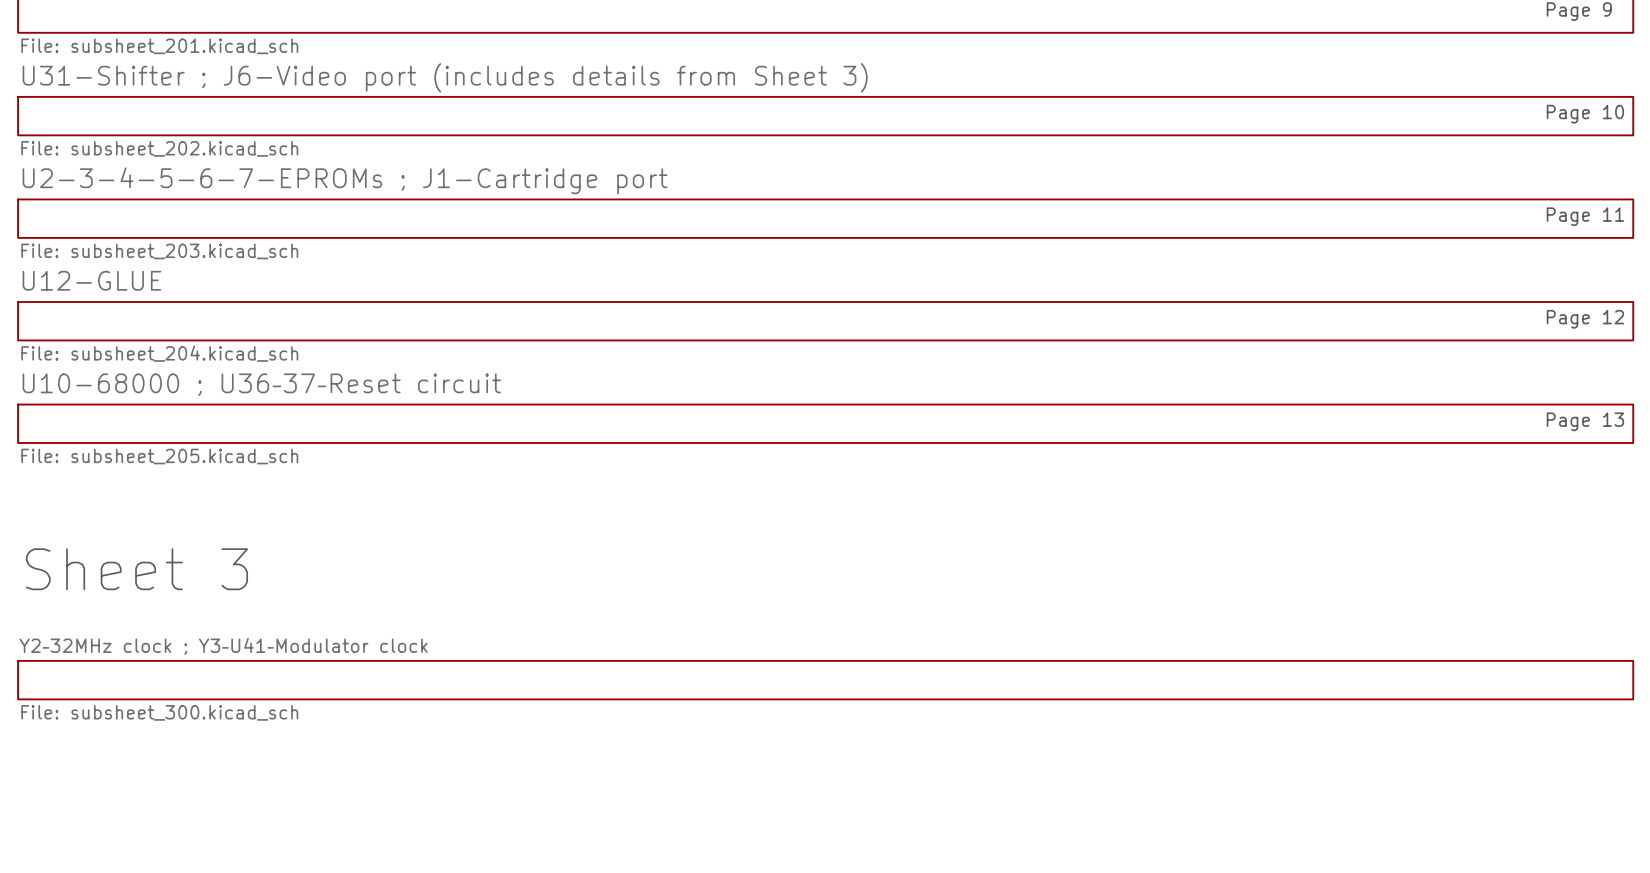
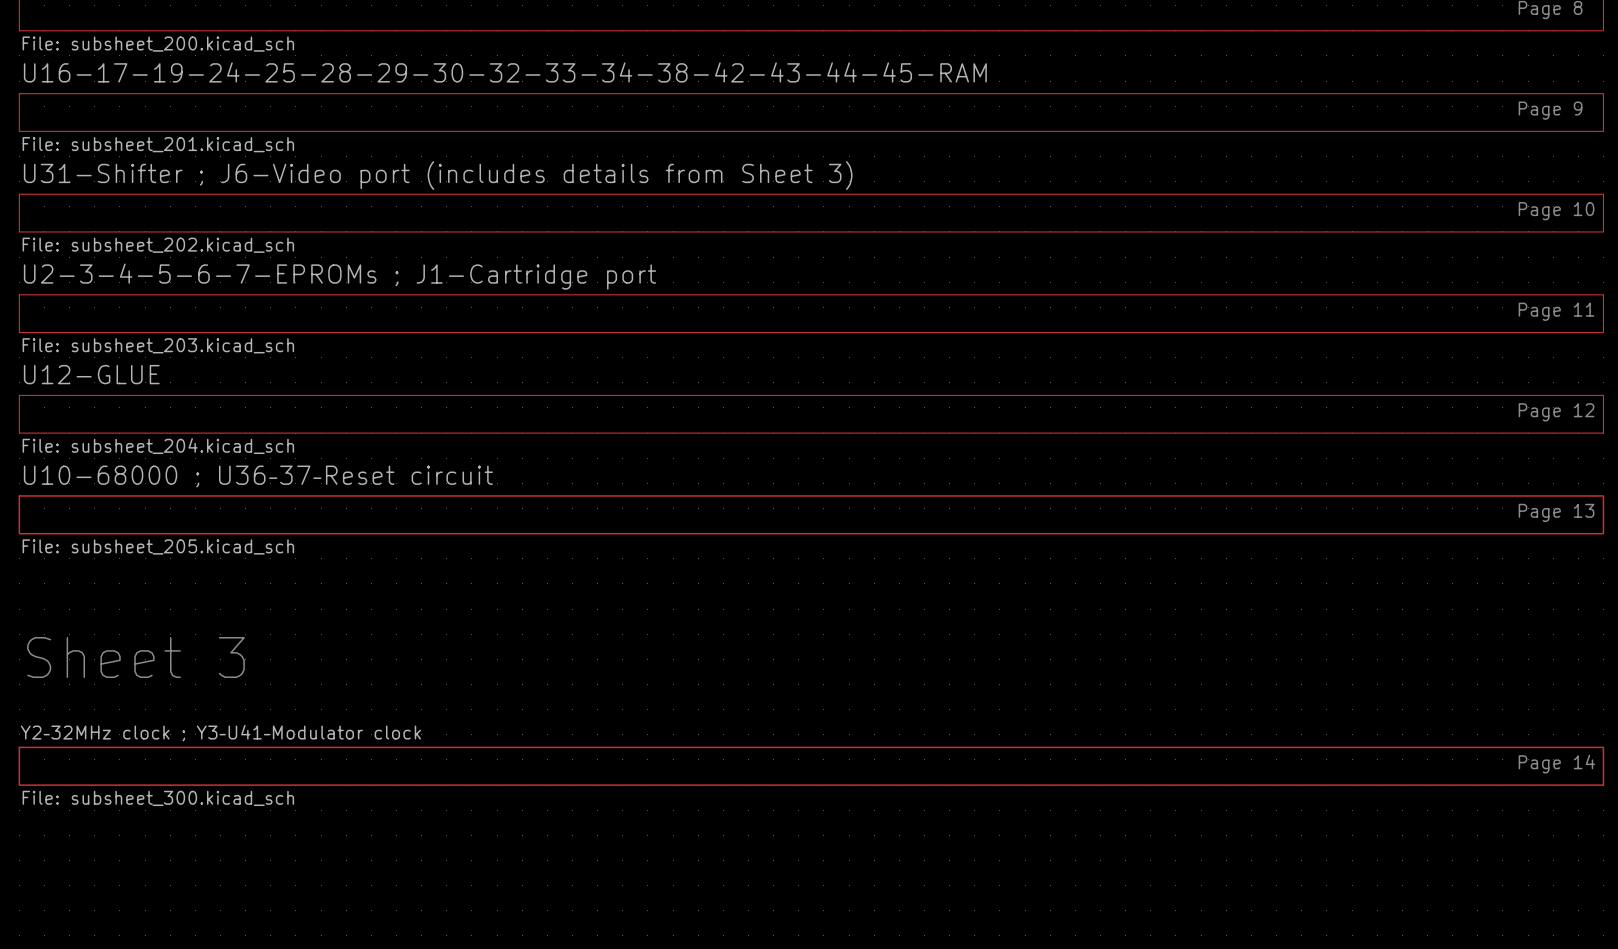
text: none -> Page 14 (1556, 764)

